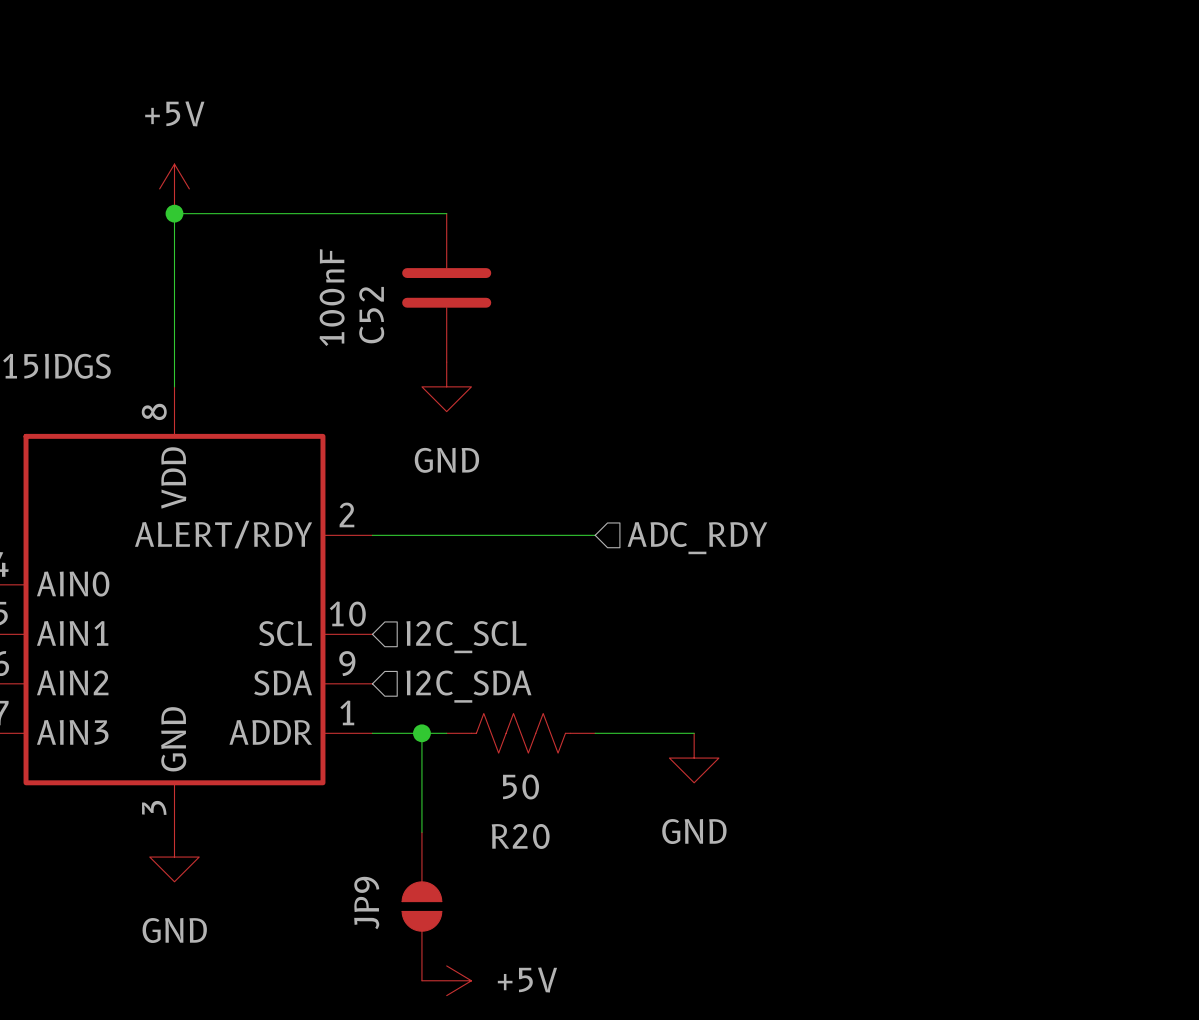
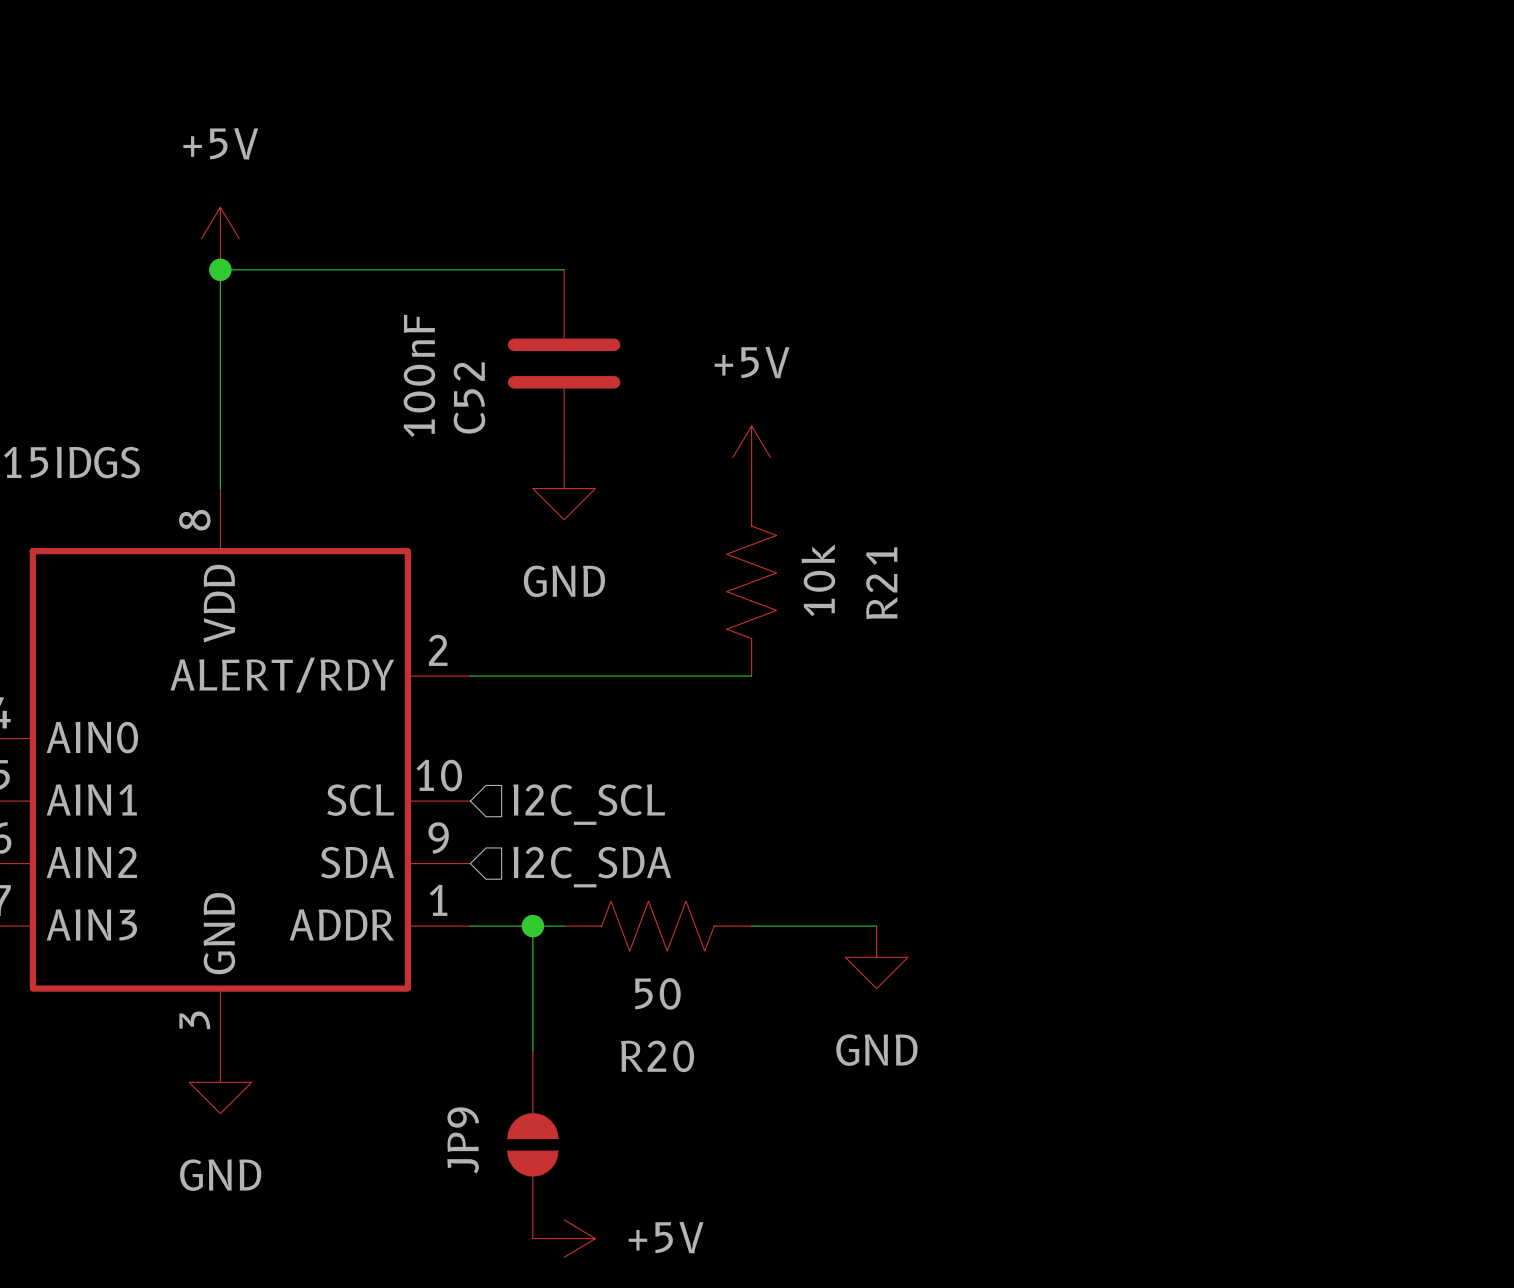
power symbol: none -> +5V (751, 457)
R21: none -> 10k (751, 582)
hierarchical label: ADC_RDY (697, 538) -> none

